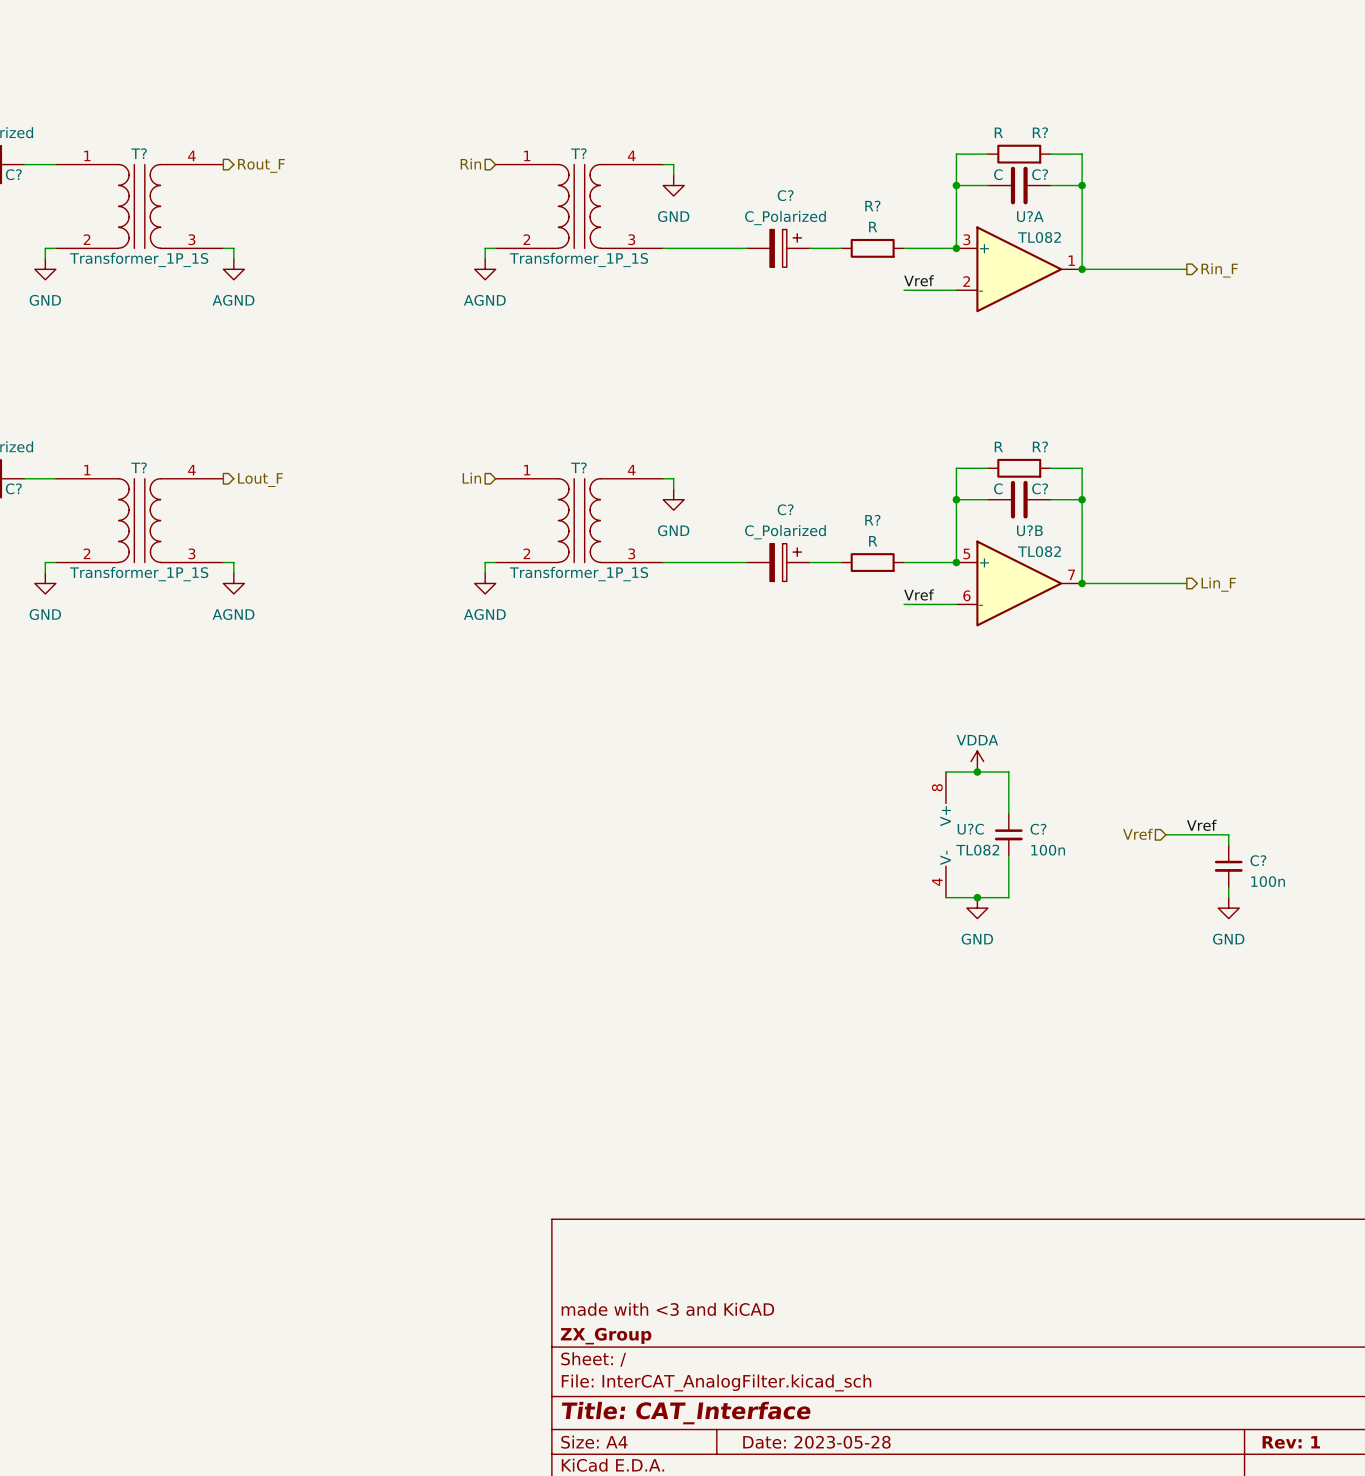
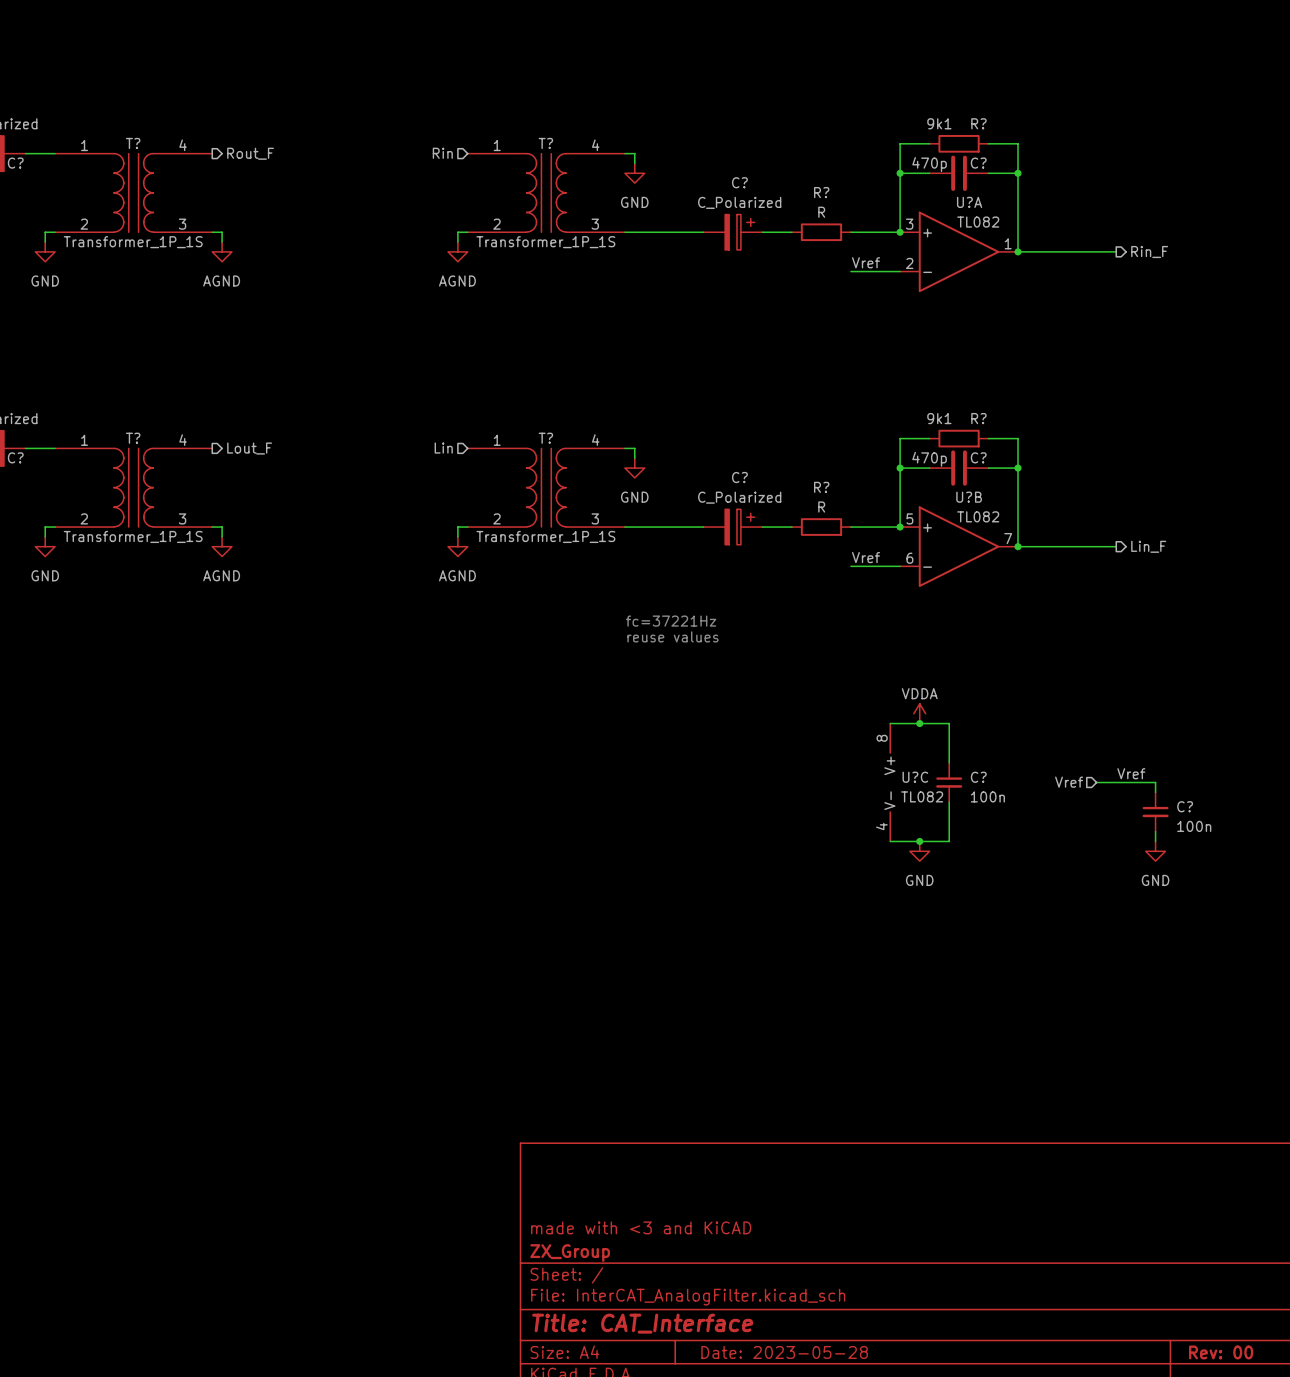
R? value: R (998, 132) -> 9k1 (939, 123)
C? value: C (998, 174) -> 470p (929, 164)
R? value: R (998, 446) -> 9k1 (939, 418)
C? value: C (998, 488) -> 470p (929, 459)
text: none -> fc=37221Hz (671, 621)
text: none -> reuse values (672, 636)
title block: Rev: 1 (1291, 1442) -> Rev: 00 (1221, 1352)

